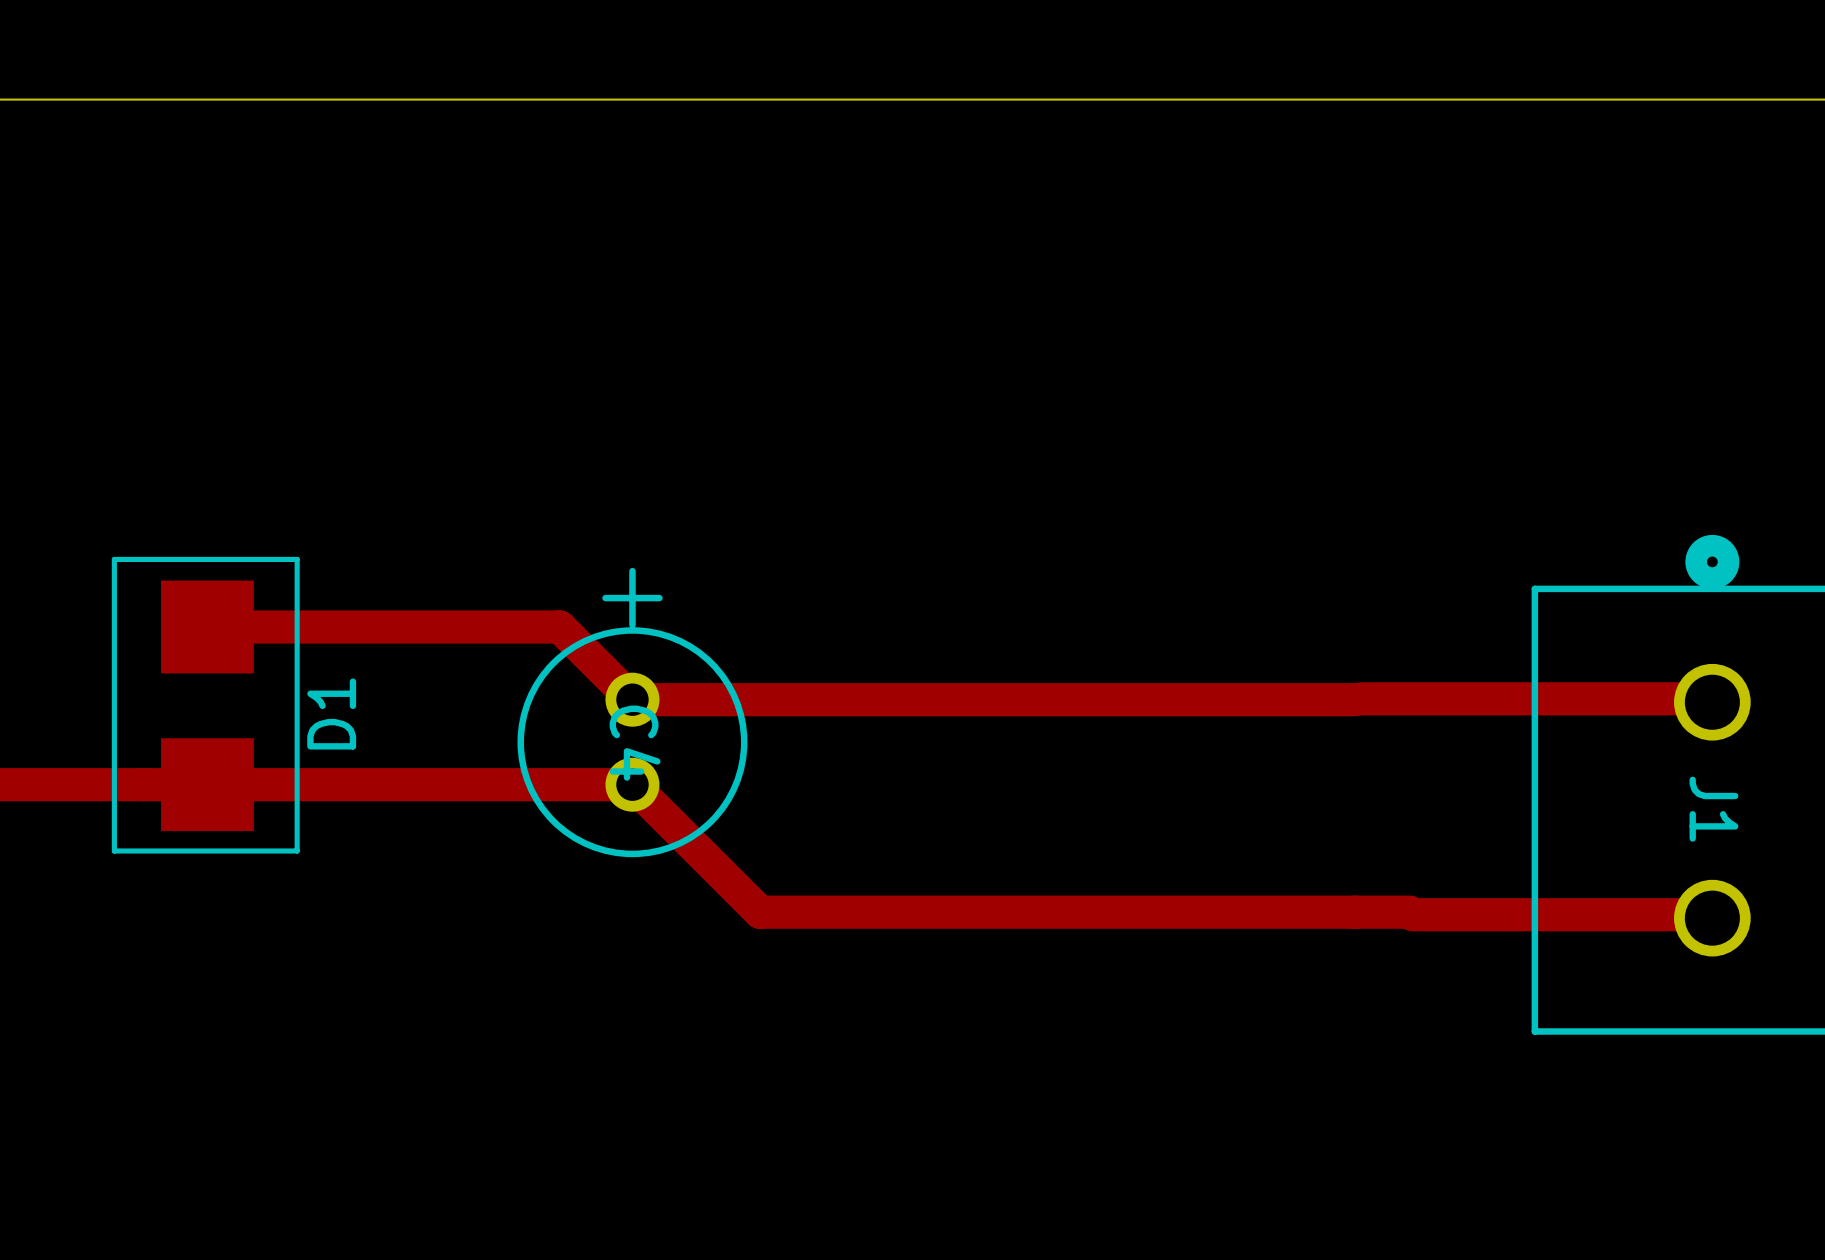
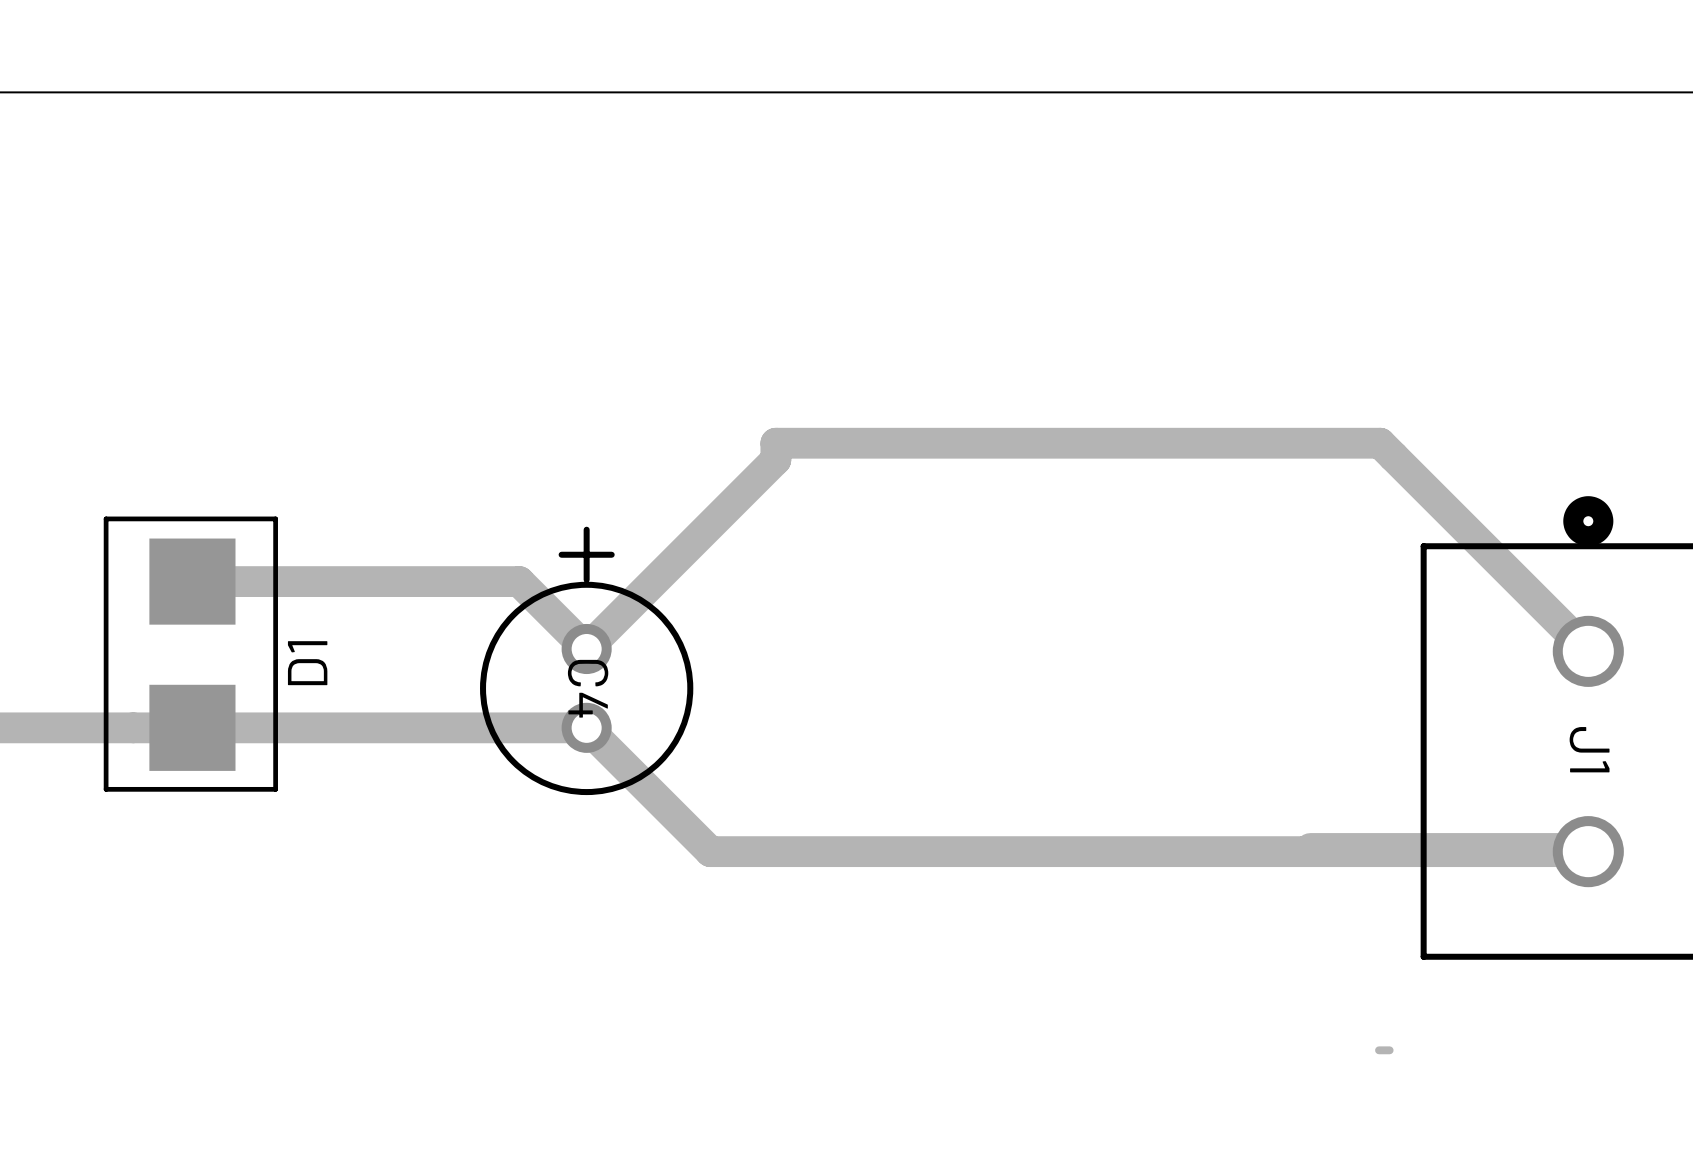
track: (1360, 698) (1712, 698) -> none
track: (632, 699) (1354, 699) -> (586, 649) (775, 459) (775, 443) (1380, 443) (1588, 651)
track: (759, 912) (1410, 912) -> (704, 846) (710, 851) (1588, 851)
track: none -> (1379, 1050) (1389, 1050)

